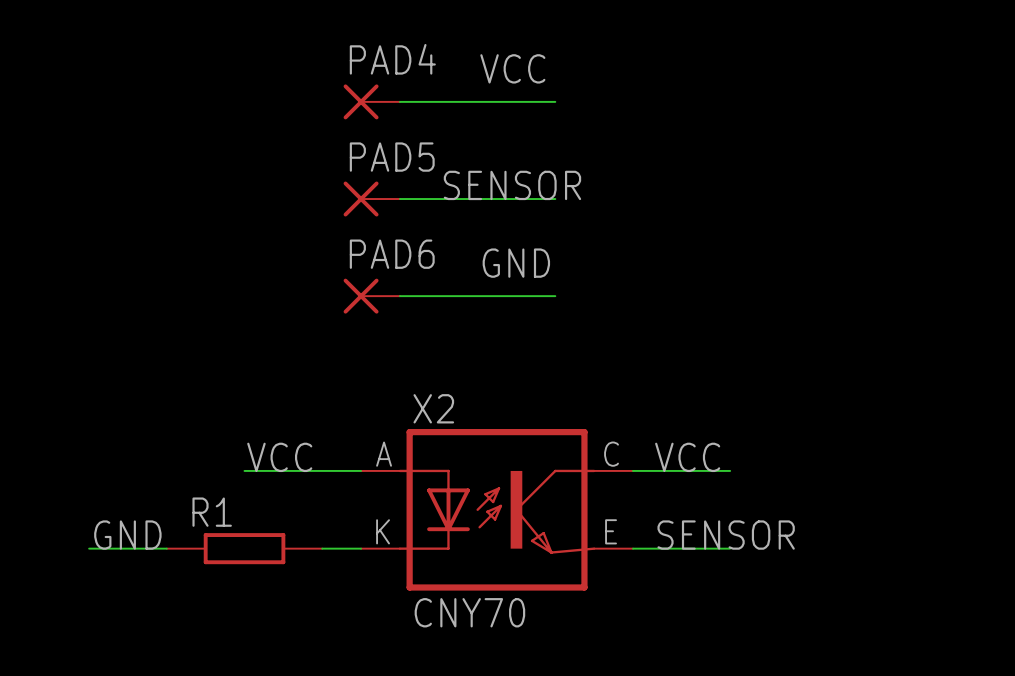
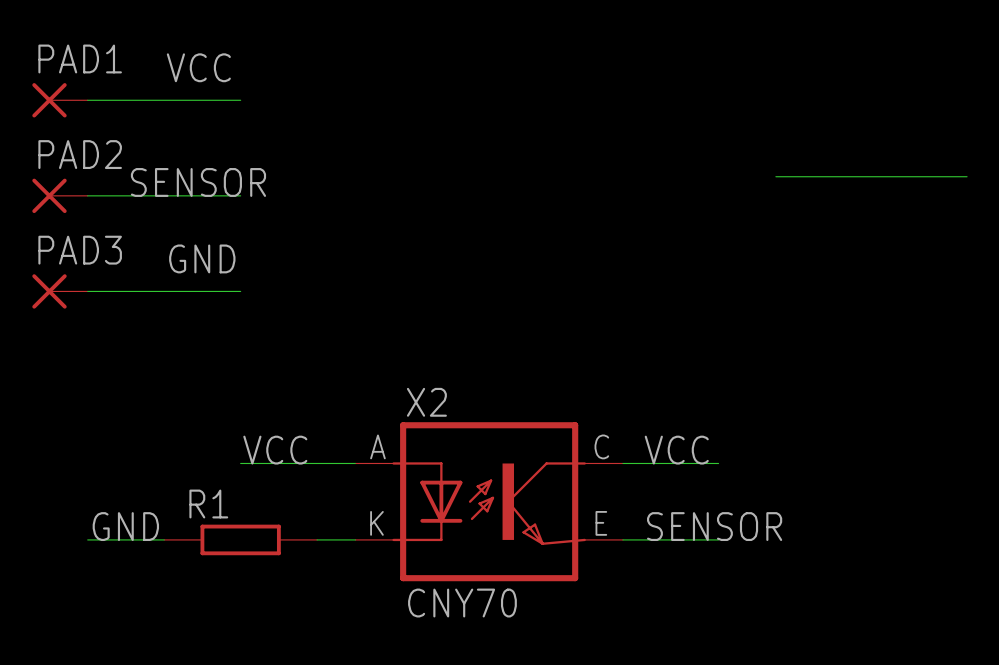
label position: VCC (512, 68) -> VCC (198, 67)
PAD1: none -> (60, 100)
PAD4: (371, 101) -> none
wire: (399, 101) (555, 101) -> (87, 100) (240, 100)
wire: none -> (775, 176) (967, 176)
label position: SENSOR (512, 185) -> SENSOR (198, 182)
PAD2: none -> (60, 195)
PAD5: (371, 199) -> none
wire: (399, 199) (555, 199) -> (87, 195) (240, 195)
label position: GND (516, 263) -> GND (202, 258)
PAD3: none -> (60, 291)
PAD6: (371, 296) -> none
wire: (399, 296) (555, 296) -> (87, 291) (240, 291)

